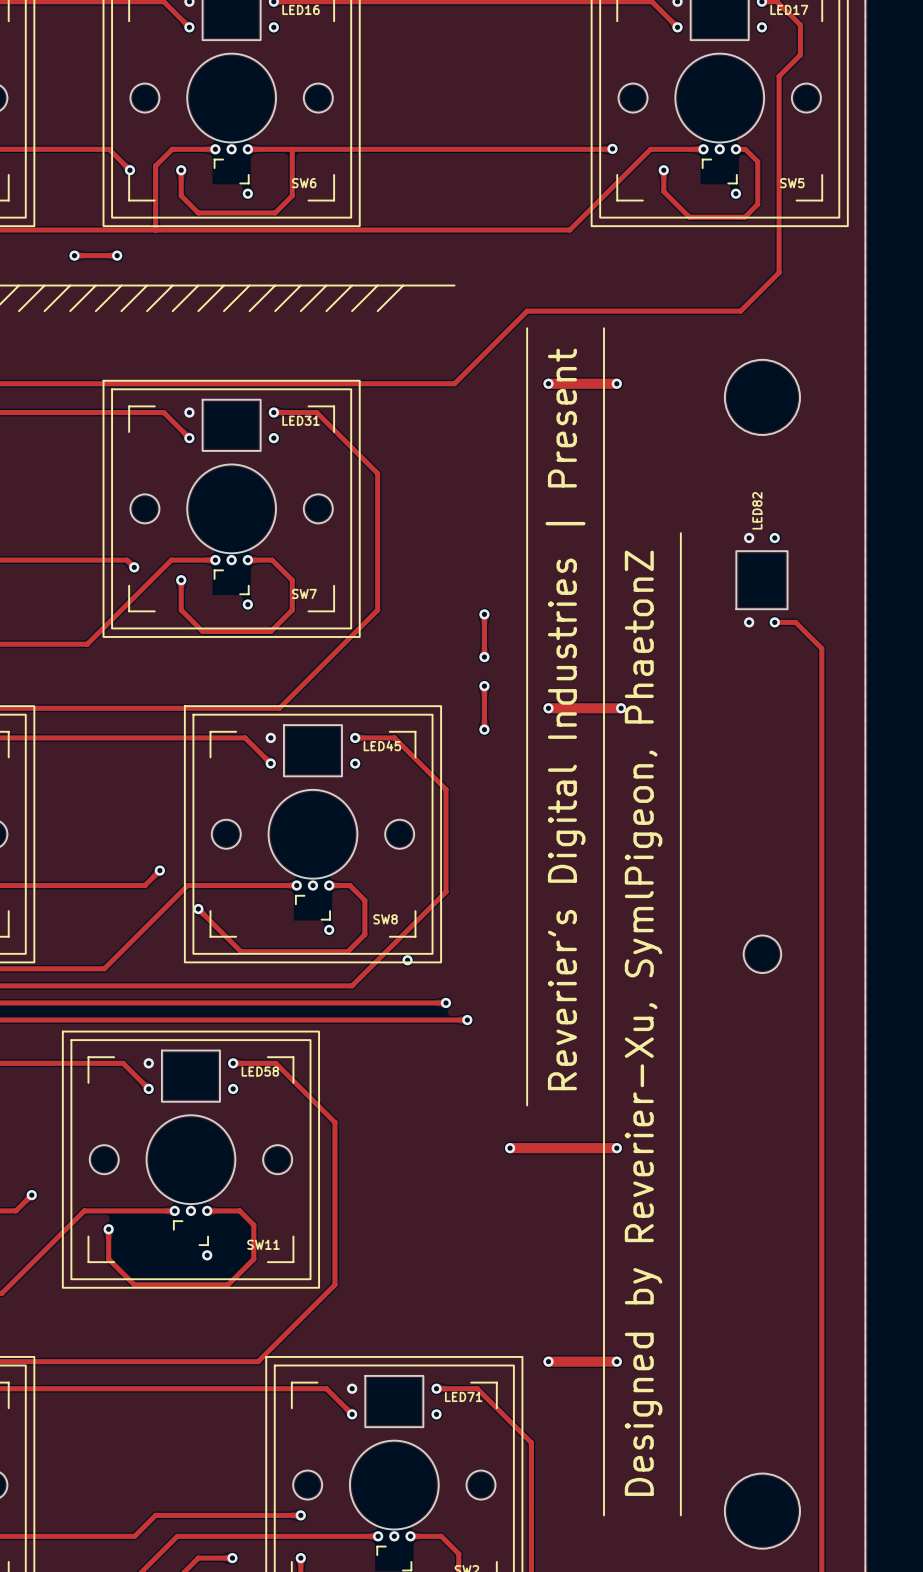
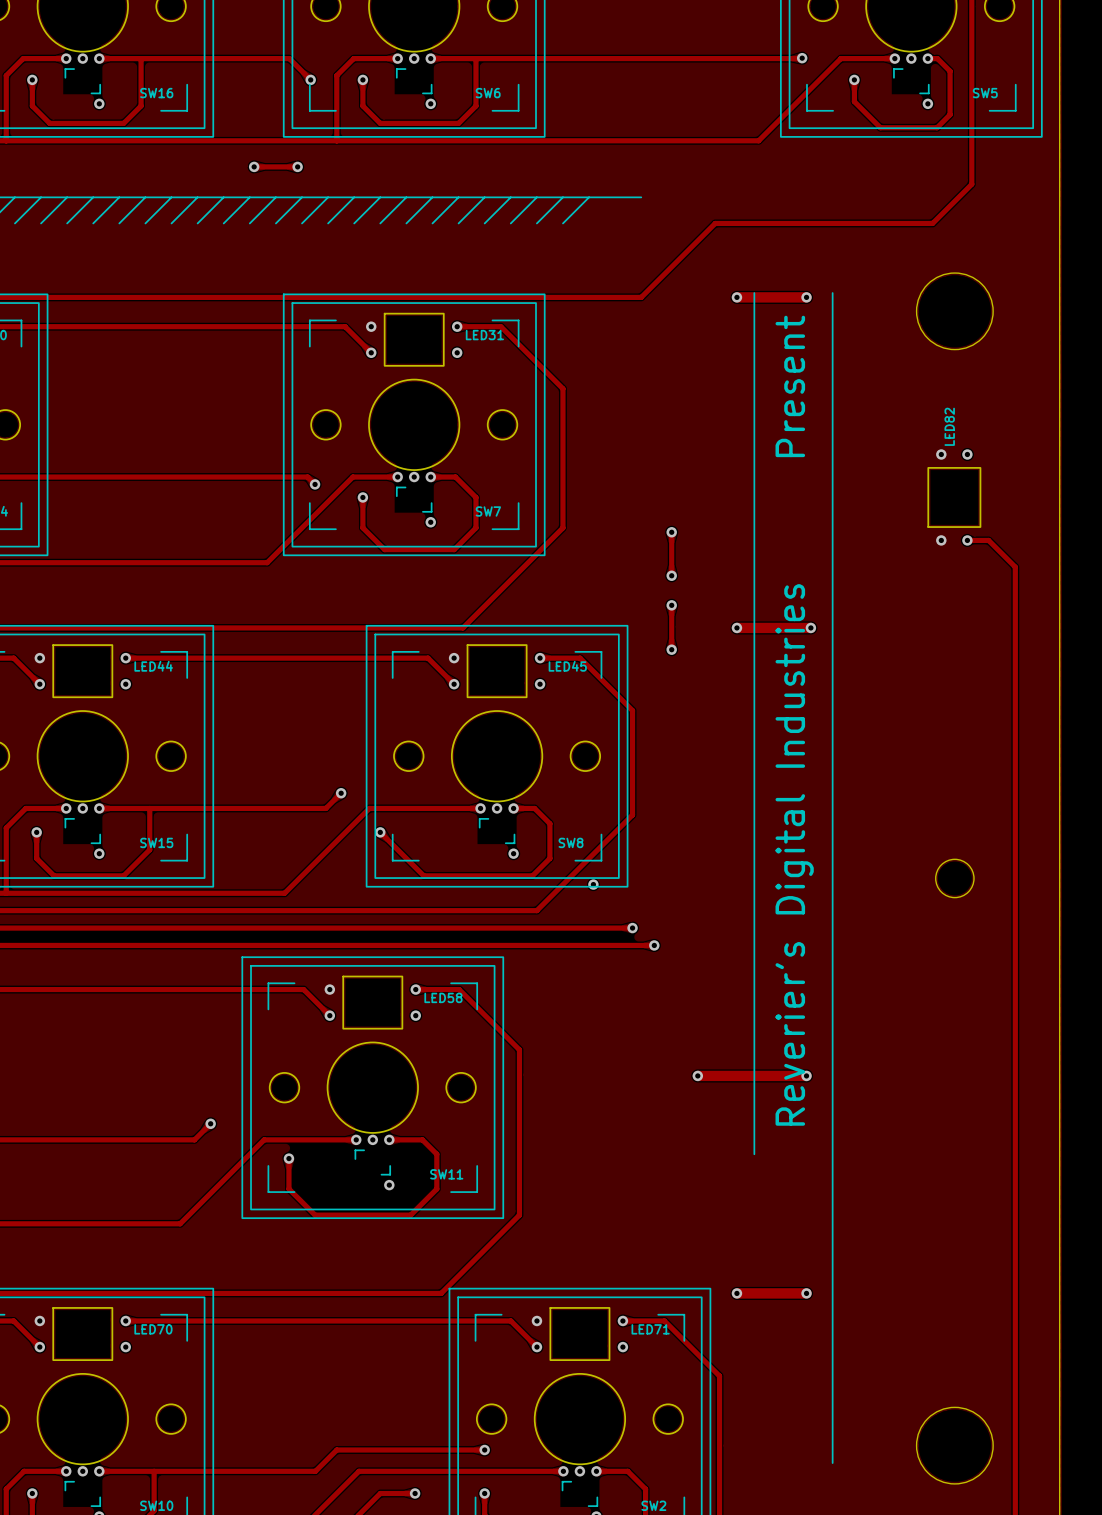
line: (527, 328) (527, 1105) -> none
line: (604, 328) (604, 1515) -> none
line: none -> (754, 293) (754, 1154)
line: none -> (832, 293) (832, 1463)
line: (680, 533) (680, 1515) -> none
text: Reverier's Digital Industries | Present (565, 719) -> Reverier's Digital Industries Present (794, 720)
text: Designed by Reverier-Xu, SymlPigeon, PhaetonZ (643, 1023) -> none

